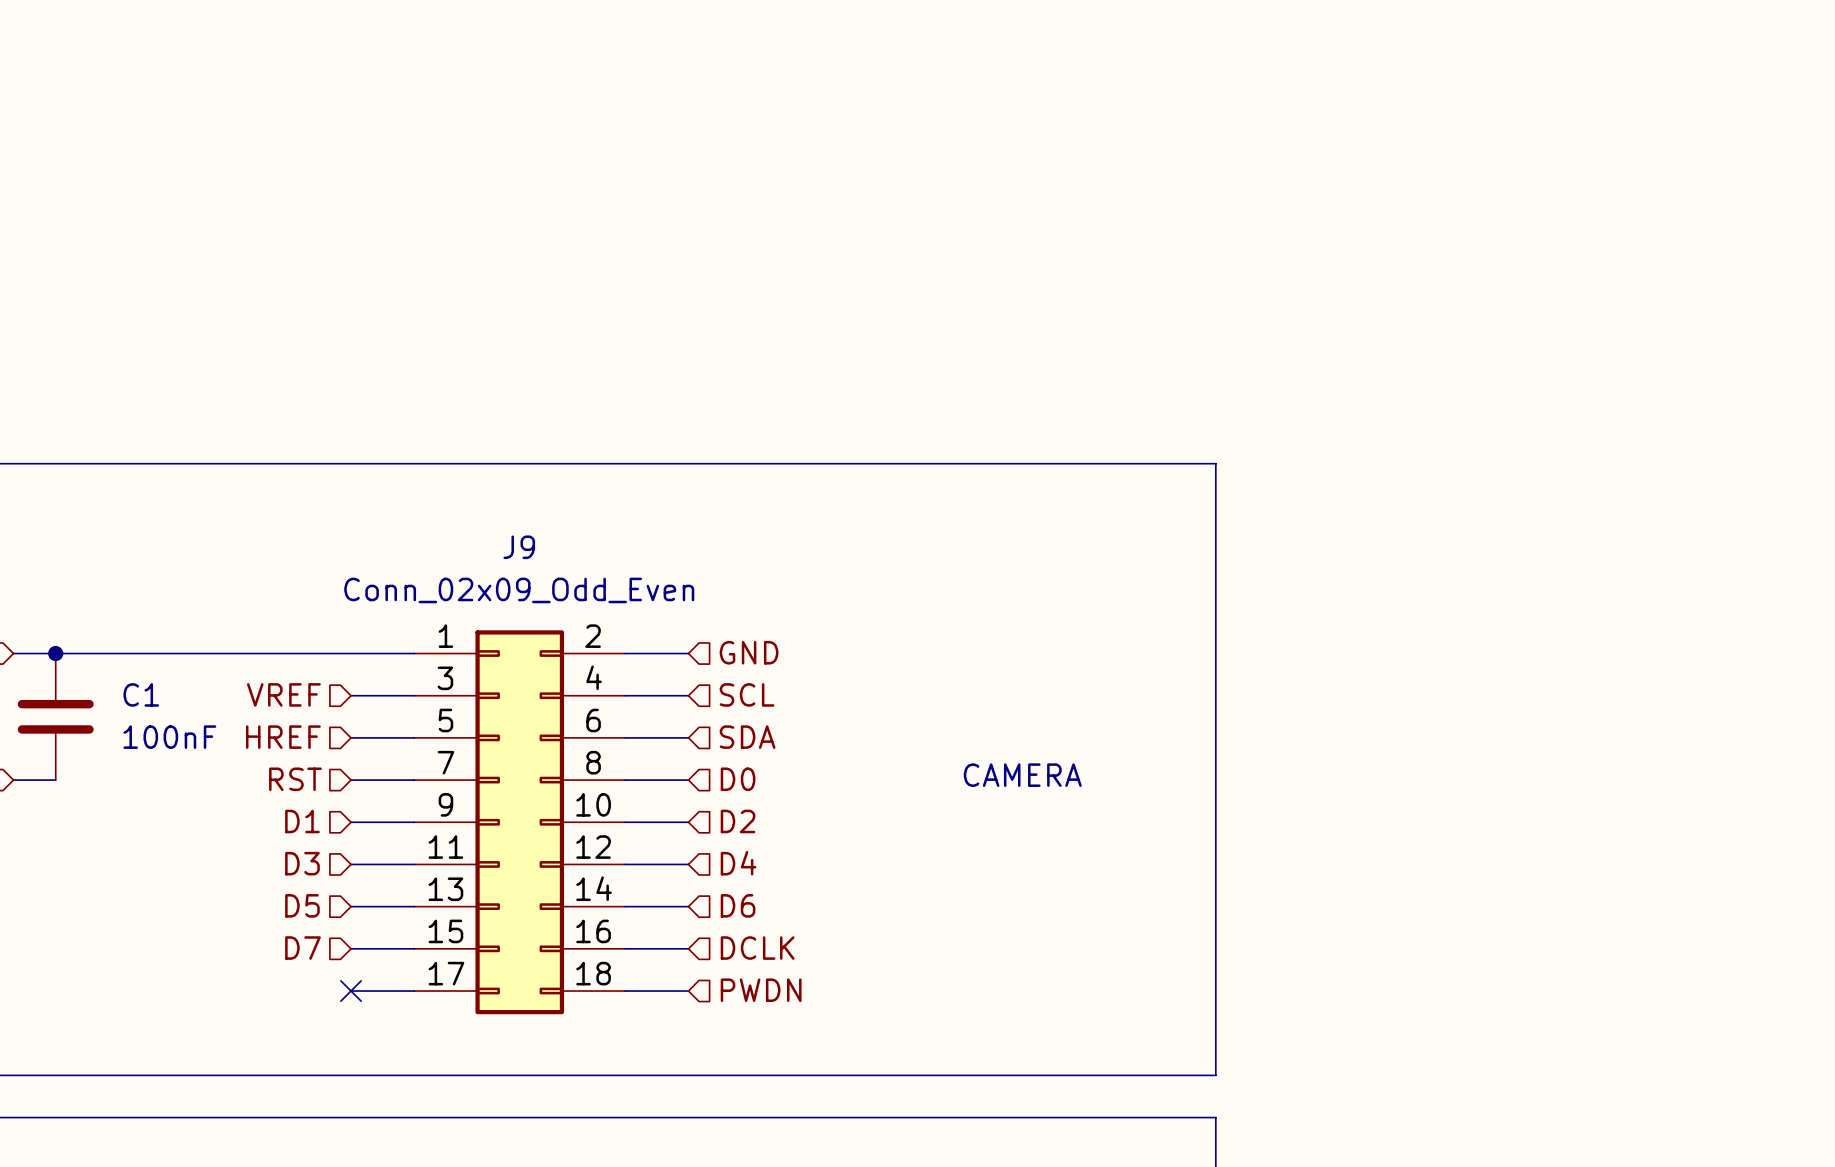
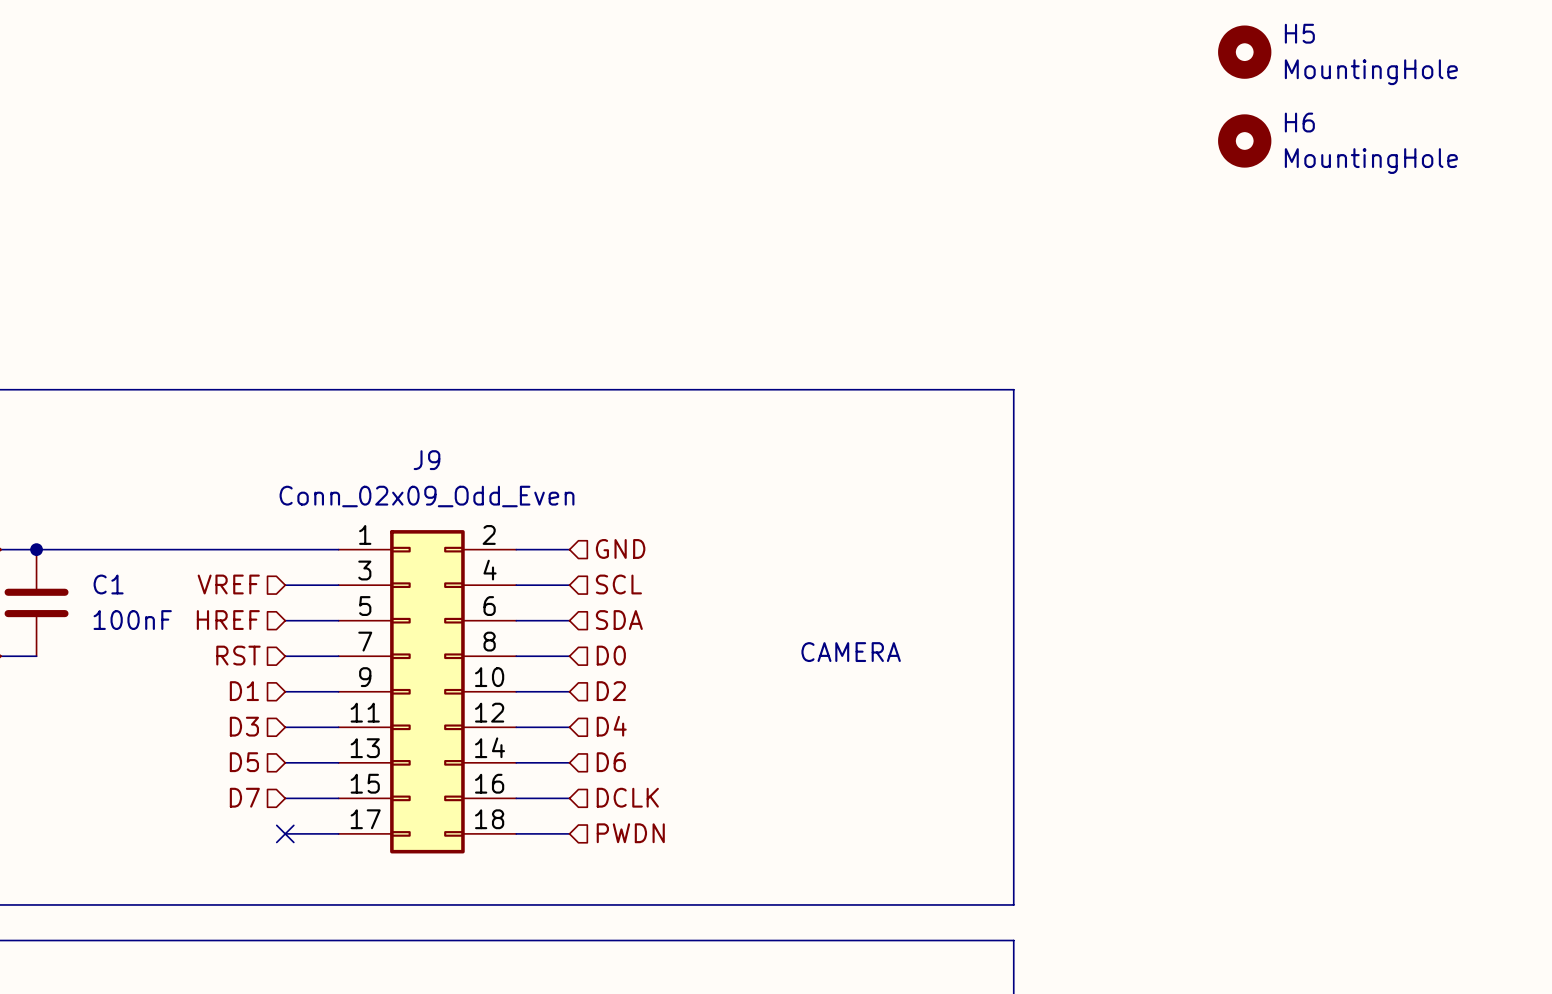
H5: none -> MountingHole (1244, 52)
H6: none -> MountingHole (1244, 140)

